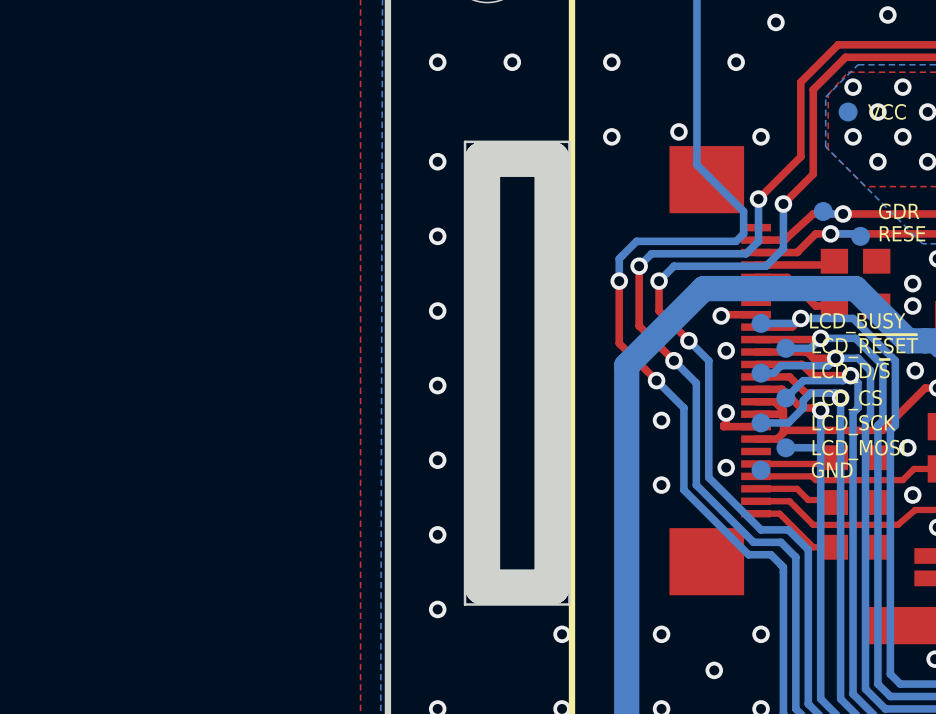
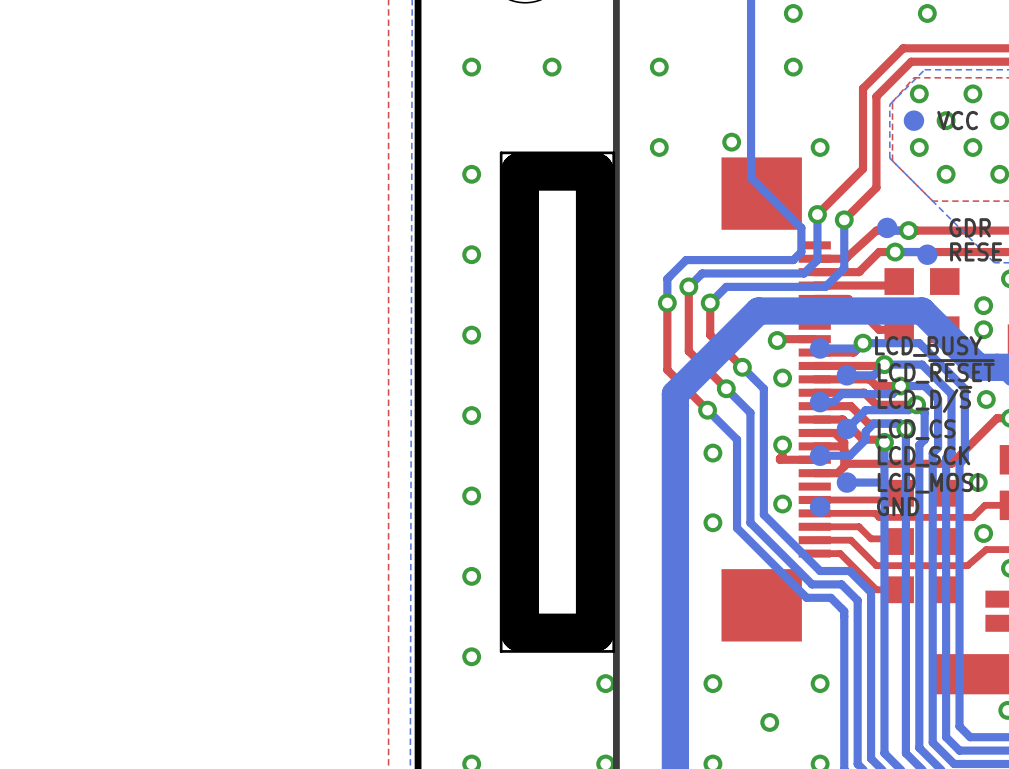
via: none -> (793, 13)
via: none -> (927, 13)
via: (887, 14) -> none
via: (775, 22) -> none

